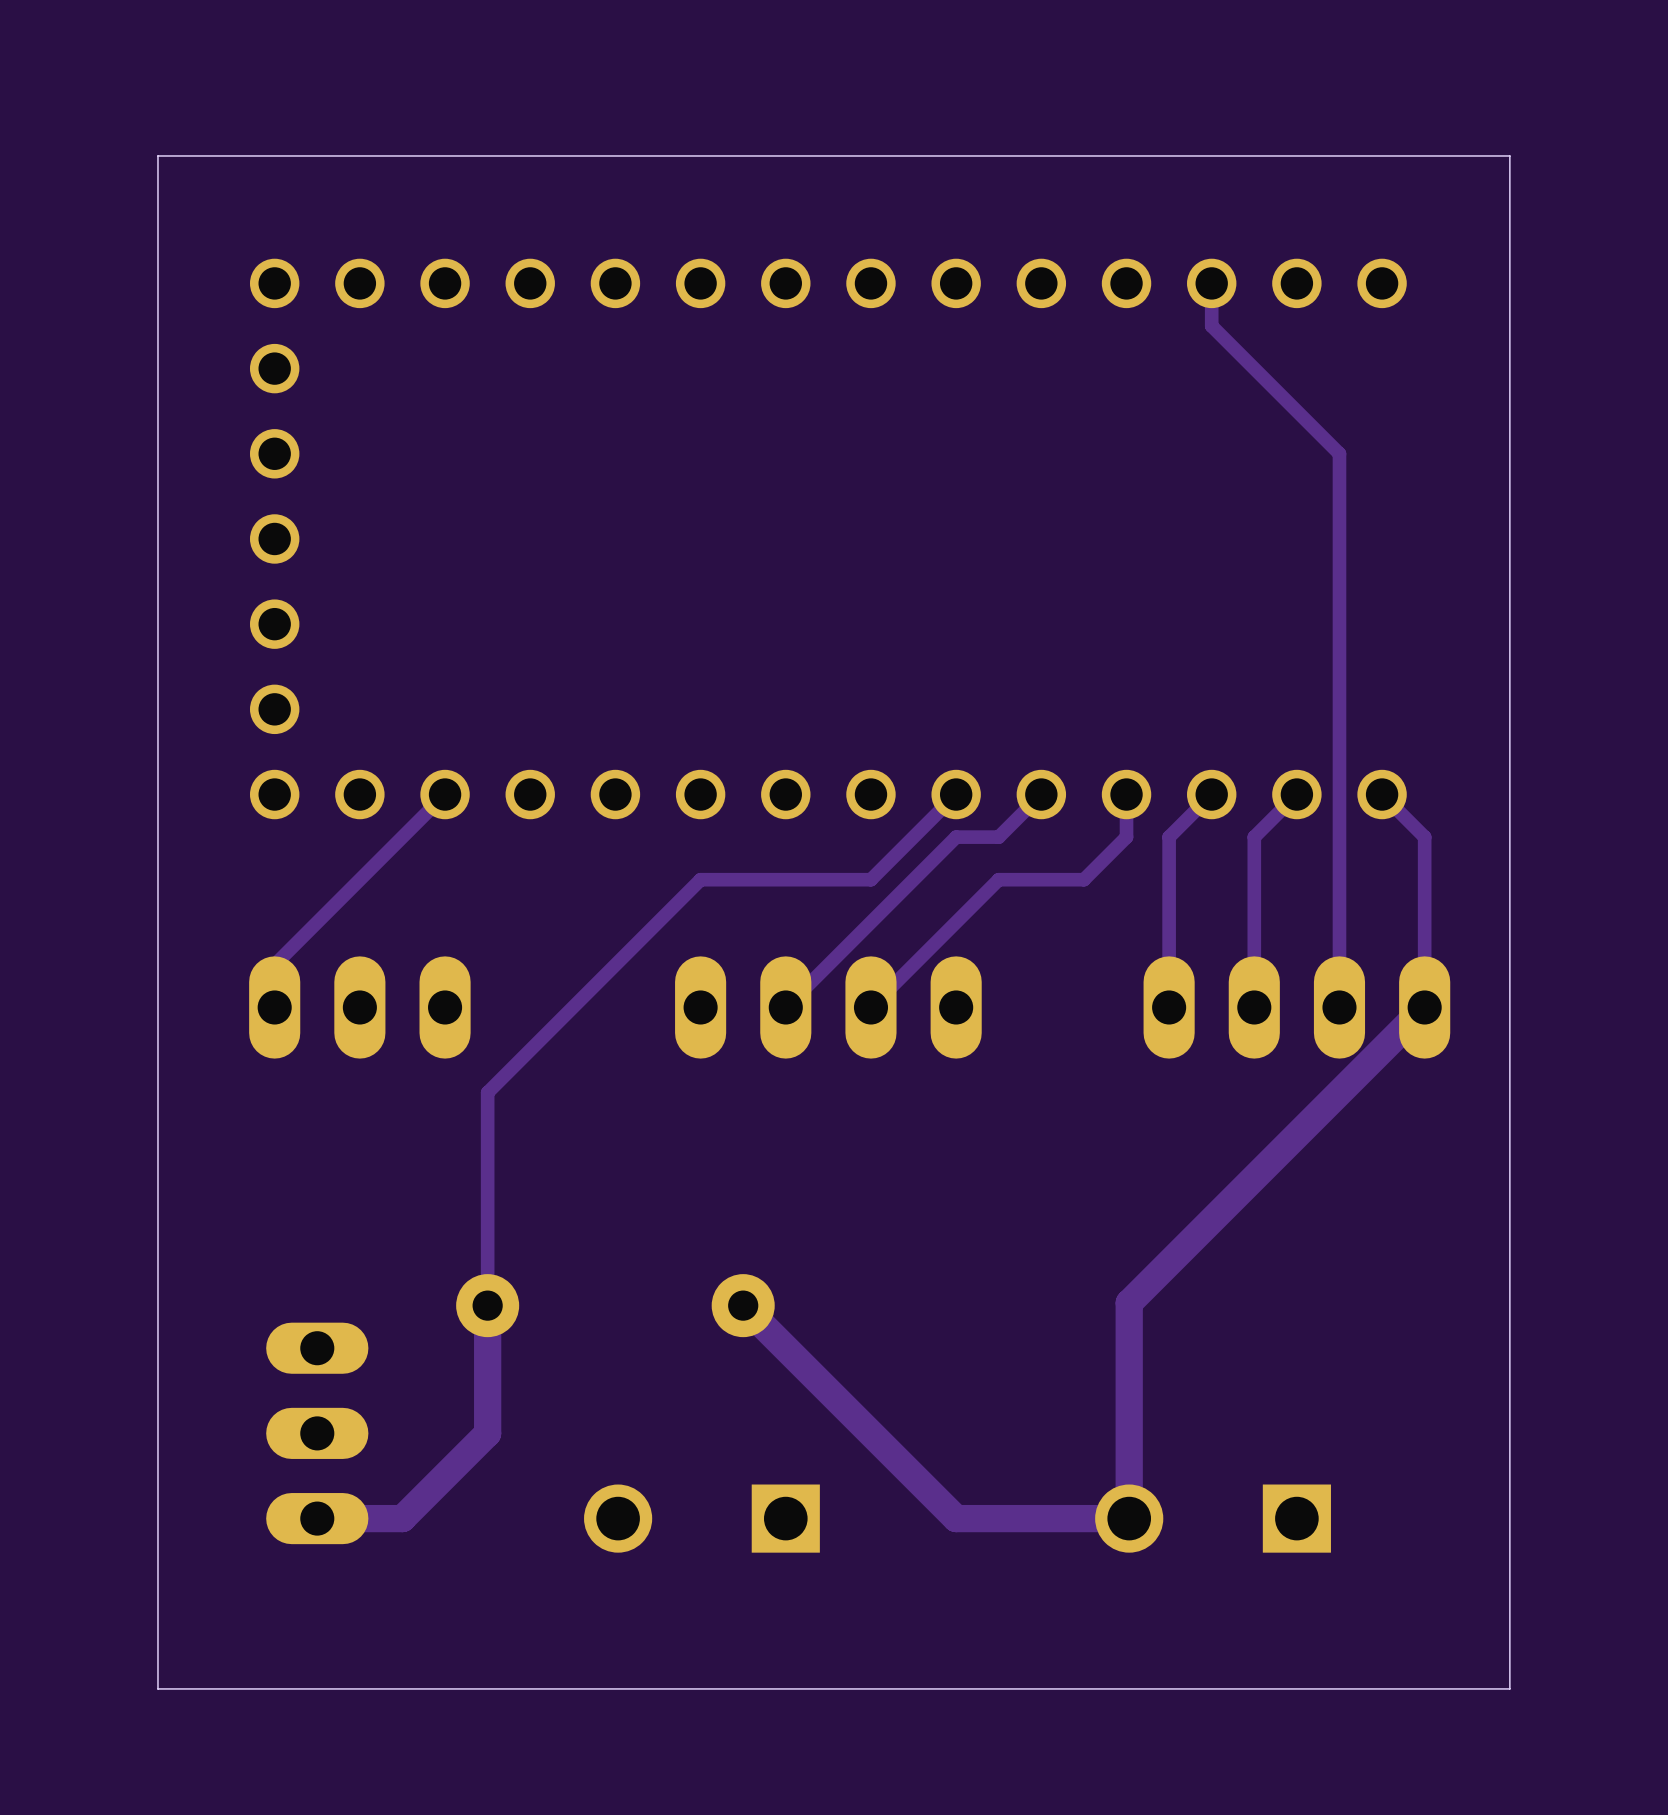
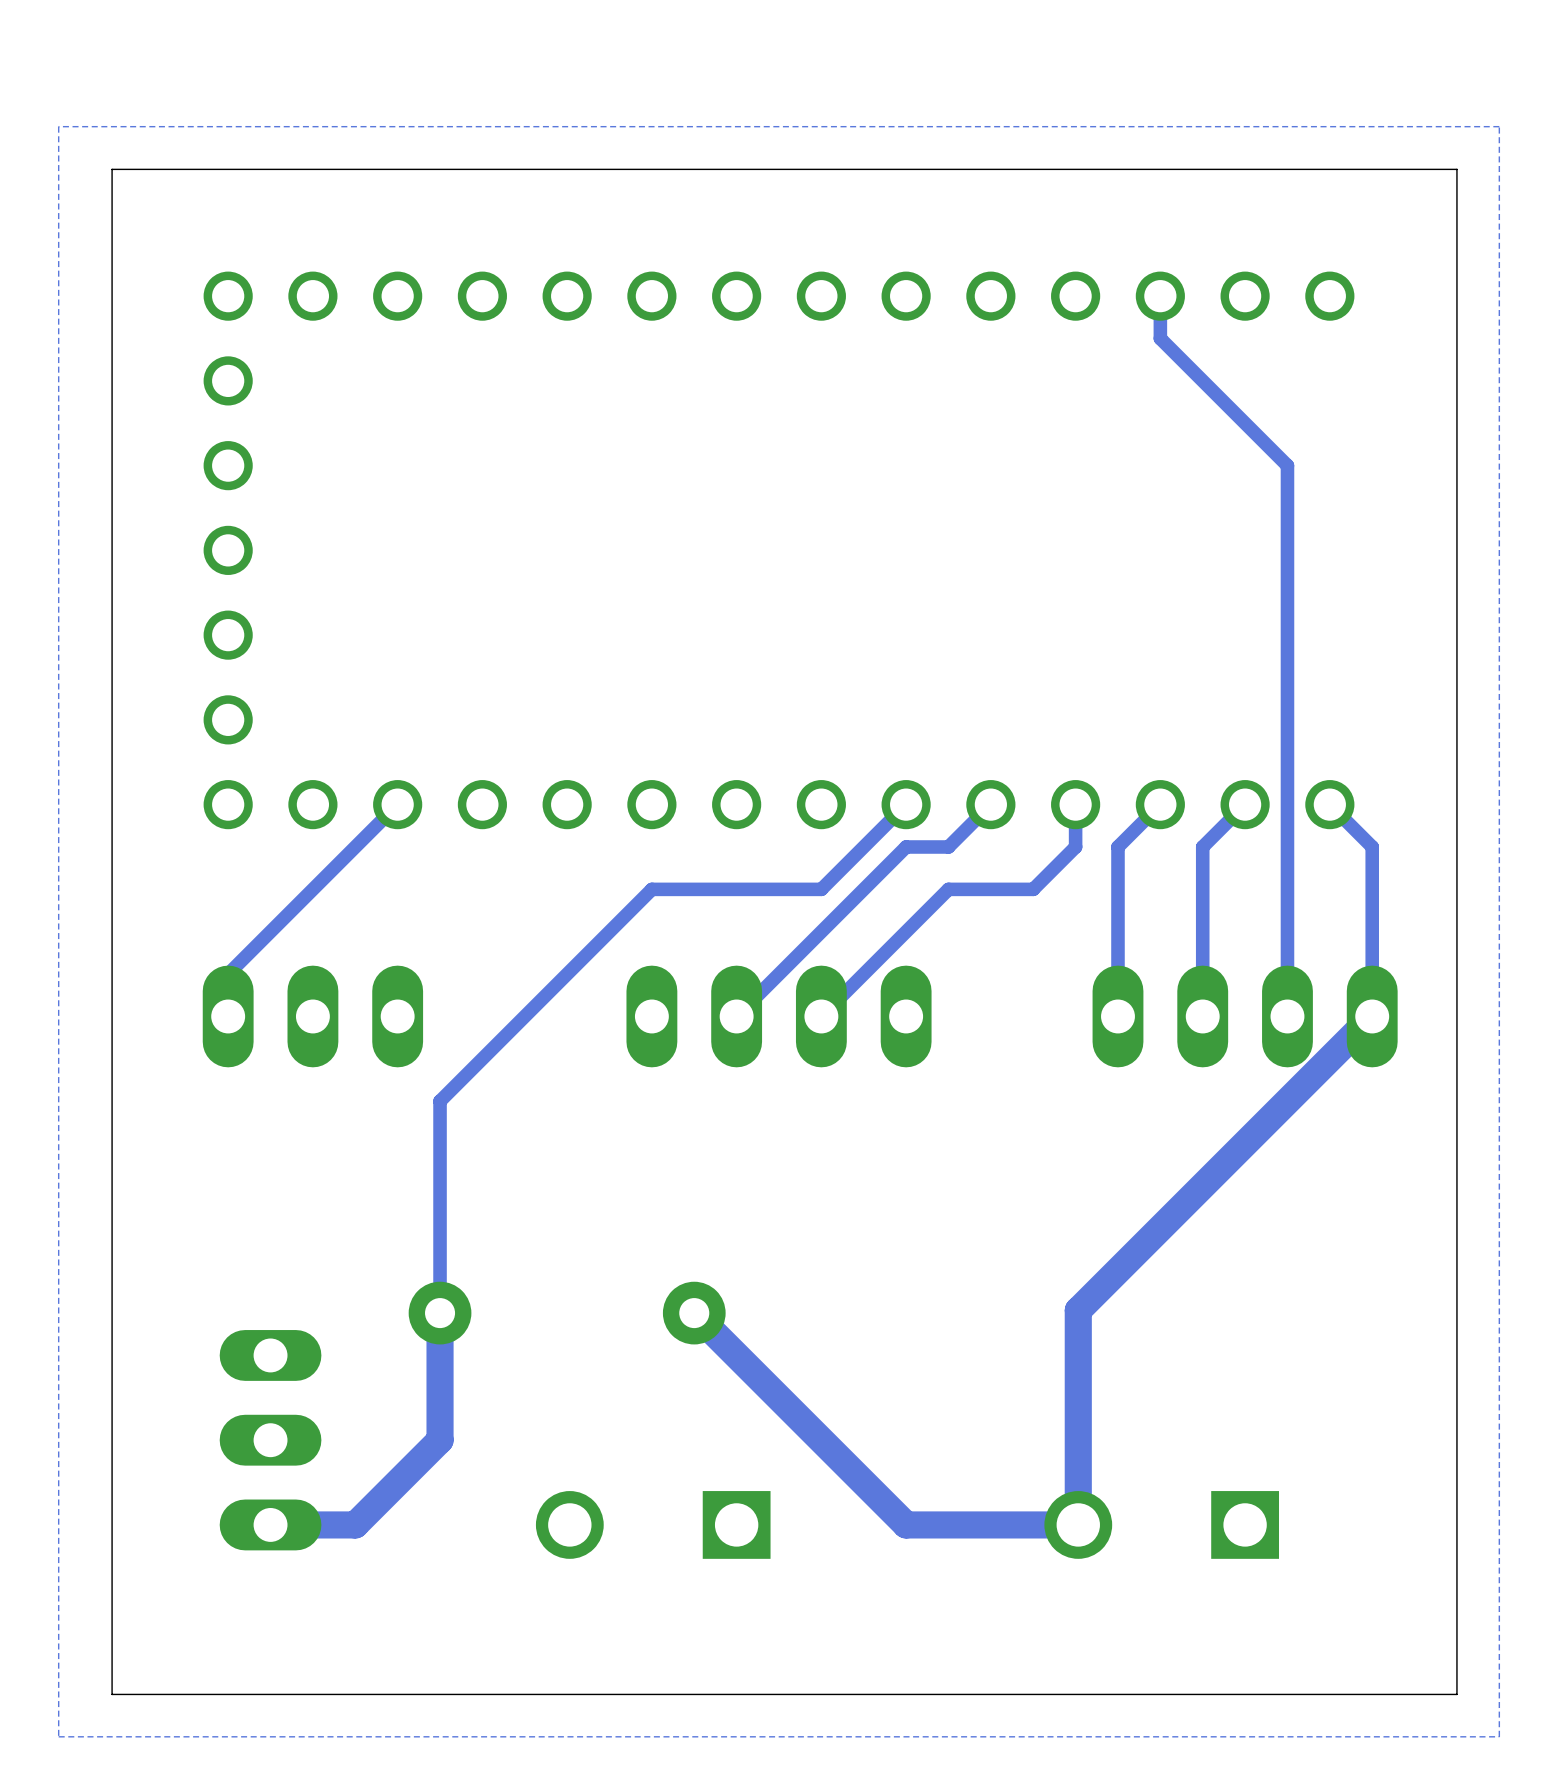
zone outline: none -> (1499, 126) (58, 126) (58, 1736) (1499, 1736) (1499, 126)

